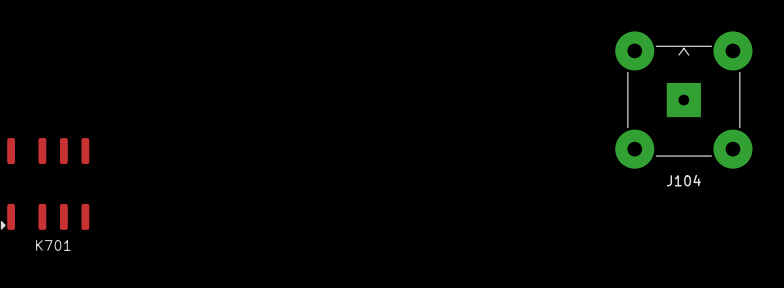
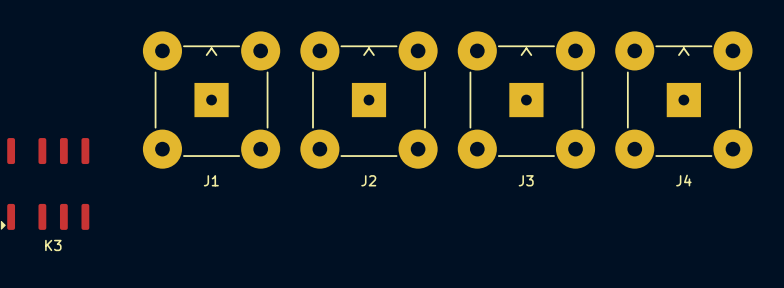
J1: none -> (211, 100)
J2: none -> (368, 100)
J3: none -> (526, 100)
J104 name: J104 (683, 180) -> J4 (683, 180)
K701 name: K701 (53, 245) -> K3 (53, 245)

